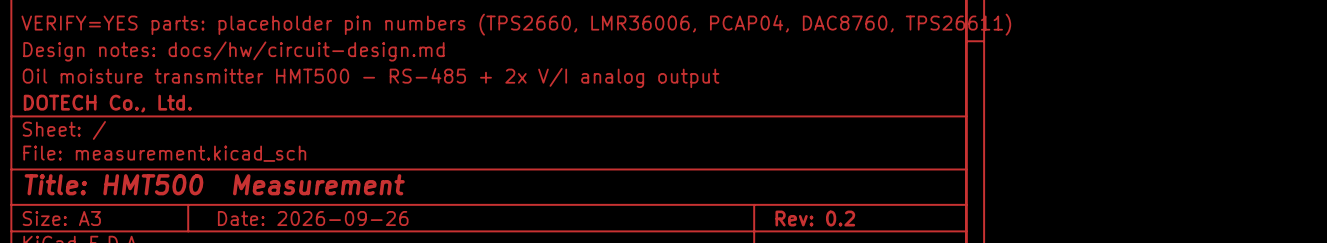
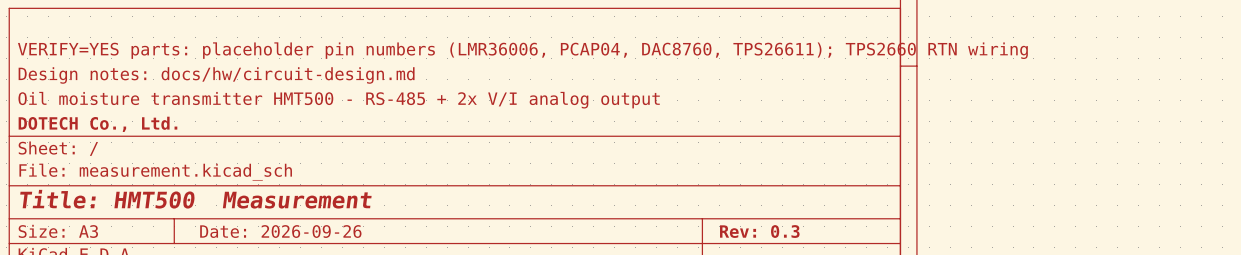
title block: VERIFY=YES parts: placeholder pin numbers (TPS2660, LMR36006, PCAP04, DAC8760, TPS26611) (516, 24) -> VERIFY=YES parts: placeholder pin numbers (LMR36006, PCAP04, DAC8760, TPS26611); TPS2660 RTN wiring (522, 50)
title block: Rev: 0.2 (815, 218) -> Rev: 0.3 (759, 231)

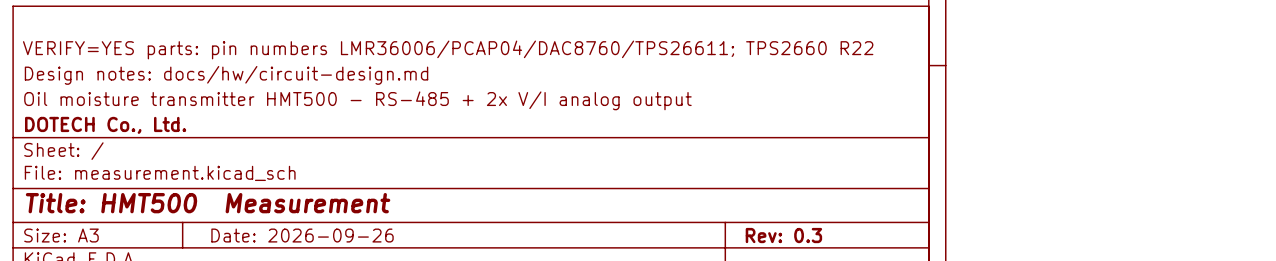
title block: VERIFY=YES parts: placeholder pin numbers (LMR36006, PCAP04, DAC8760, TPS26611); TPS2660 RTN wiring (522, 50) -> VERIFY=YES parts: pin numbers LMR36006/PCAP04/DAC8760/TPS26611; TPS2660 R22 (448, 49)

